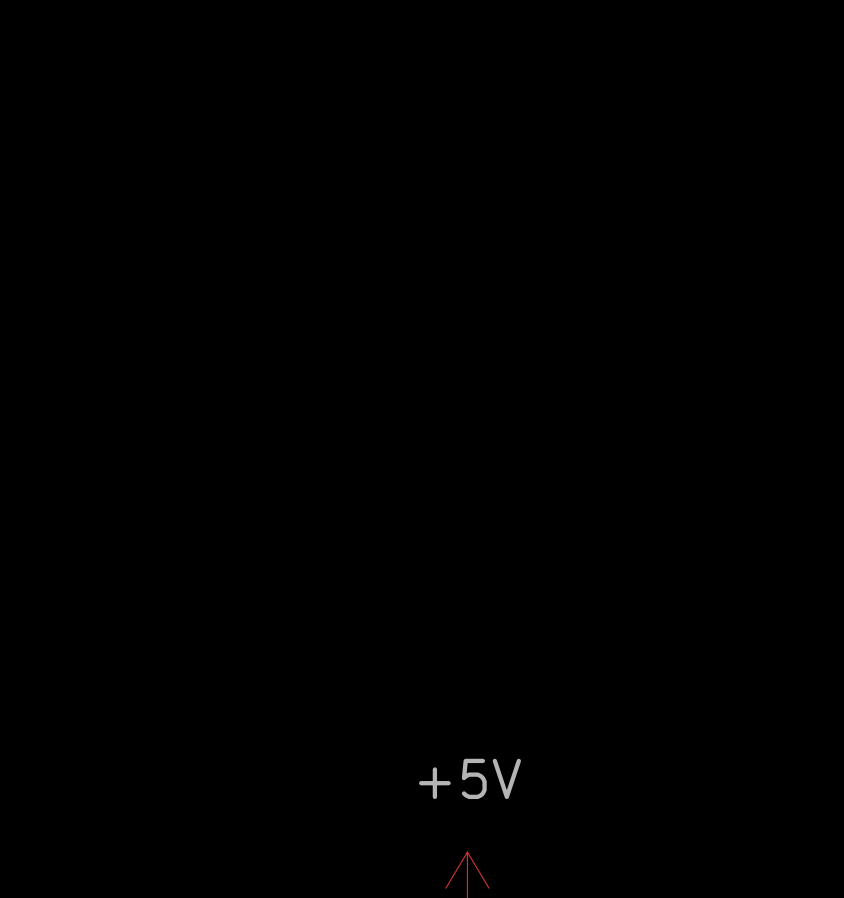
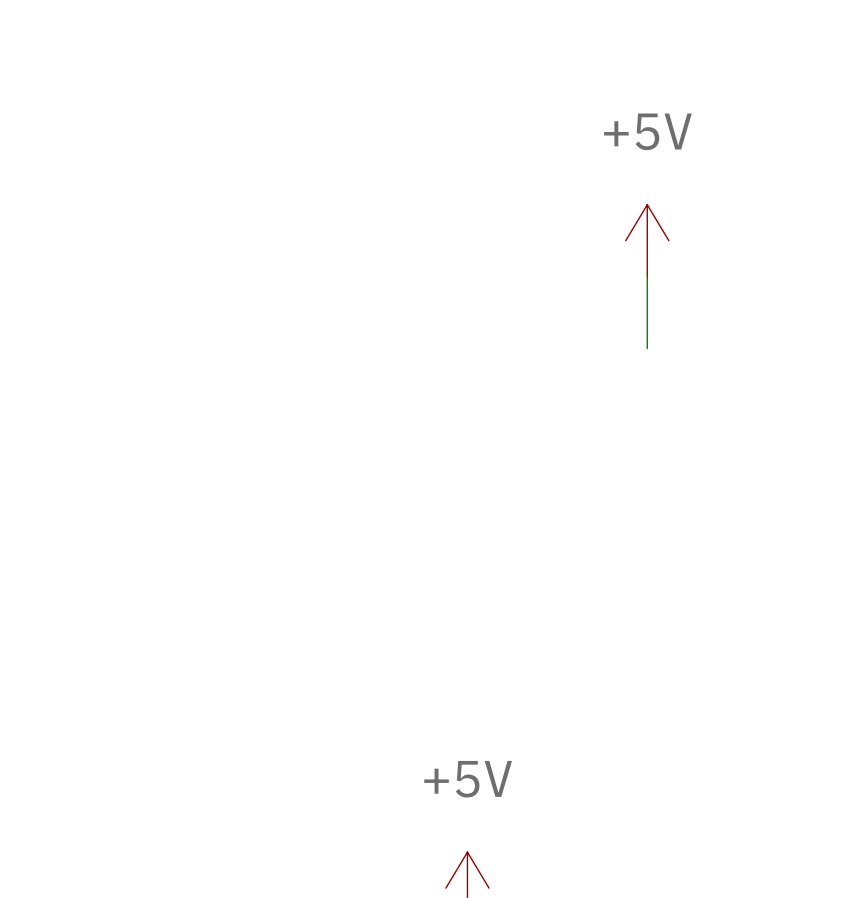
power symbol: none -> +5V (647, 240)
wire: none -> (647, 276) (647, 348)

